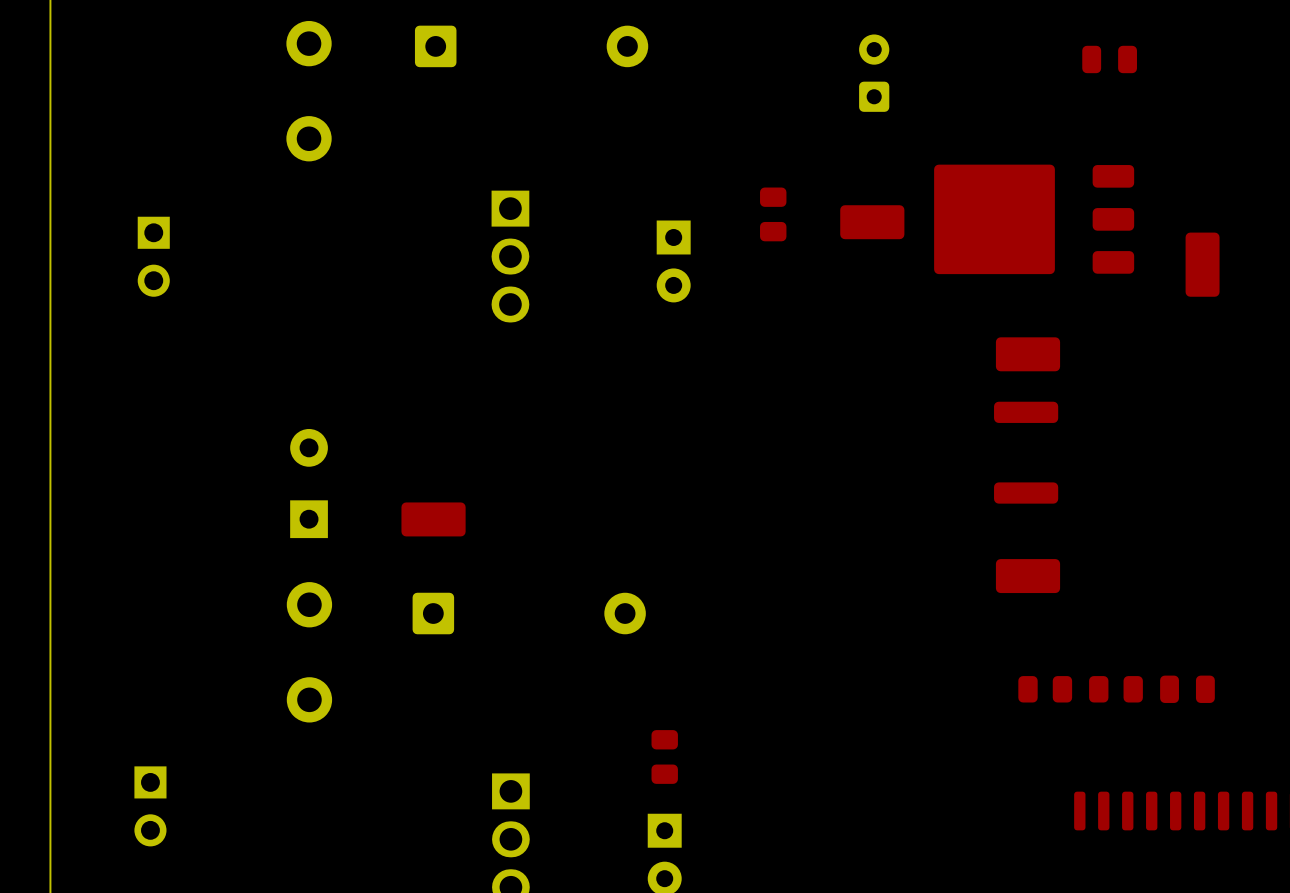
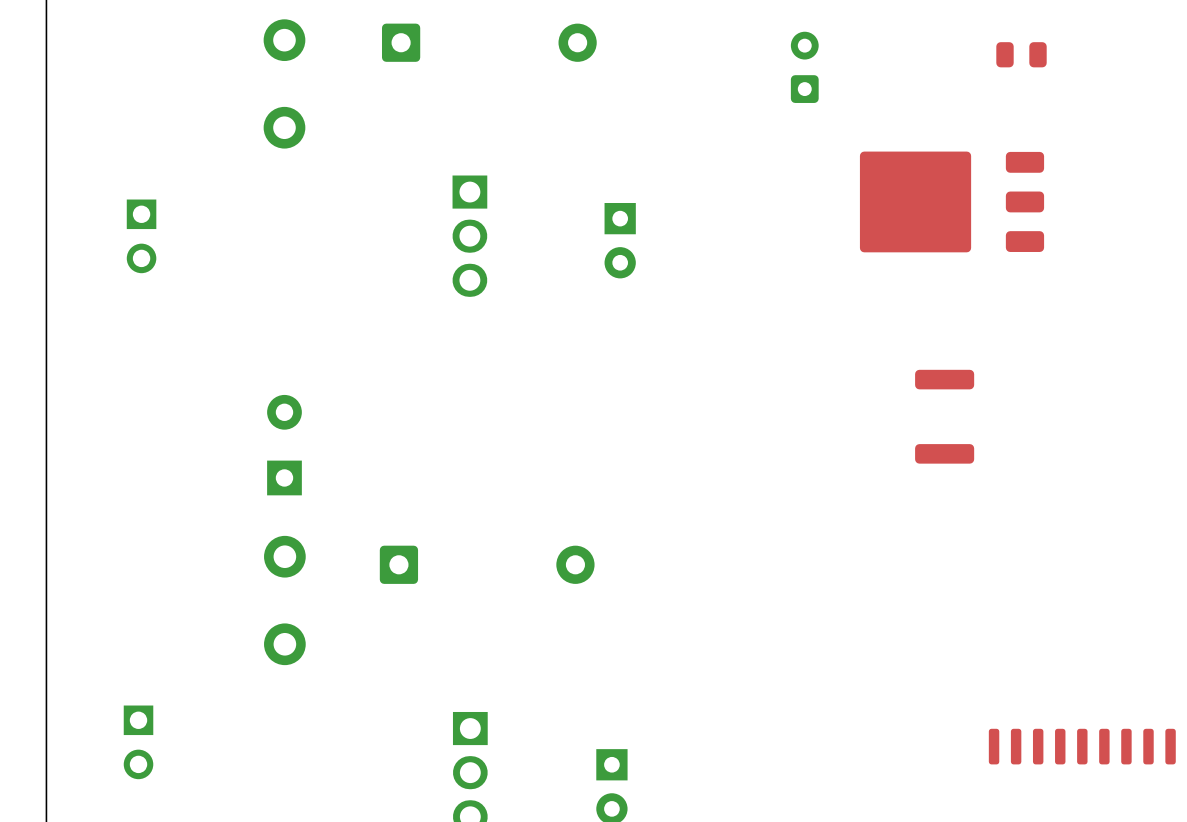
part: (773, 214) -> none
part: (872, 222) -> none
part: (1202, 264) -> none
part: (1028, 354) -> none
part: (433, 519) -> none
part: (1028, 576) -> none
part: (1045, 689) -> none
part: (1115, 689) -> none
part: (1187, 689) -> none
part: (664, 756) -> none

